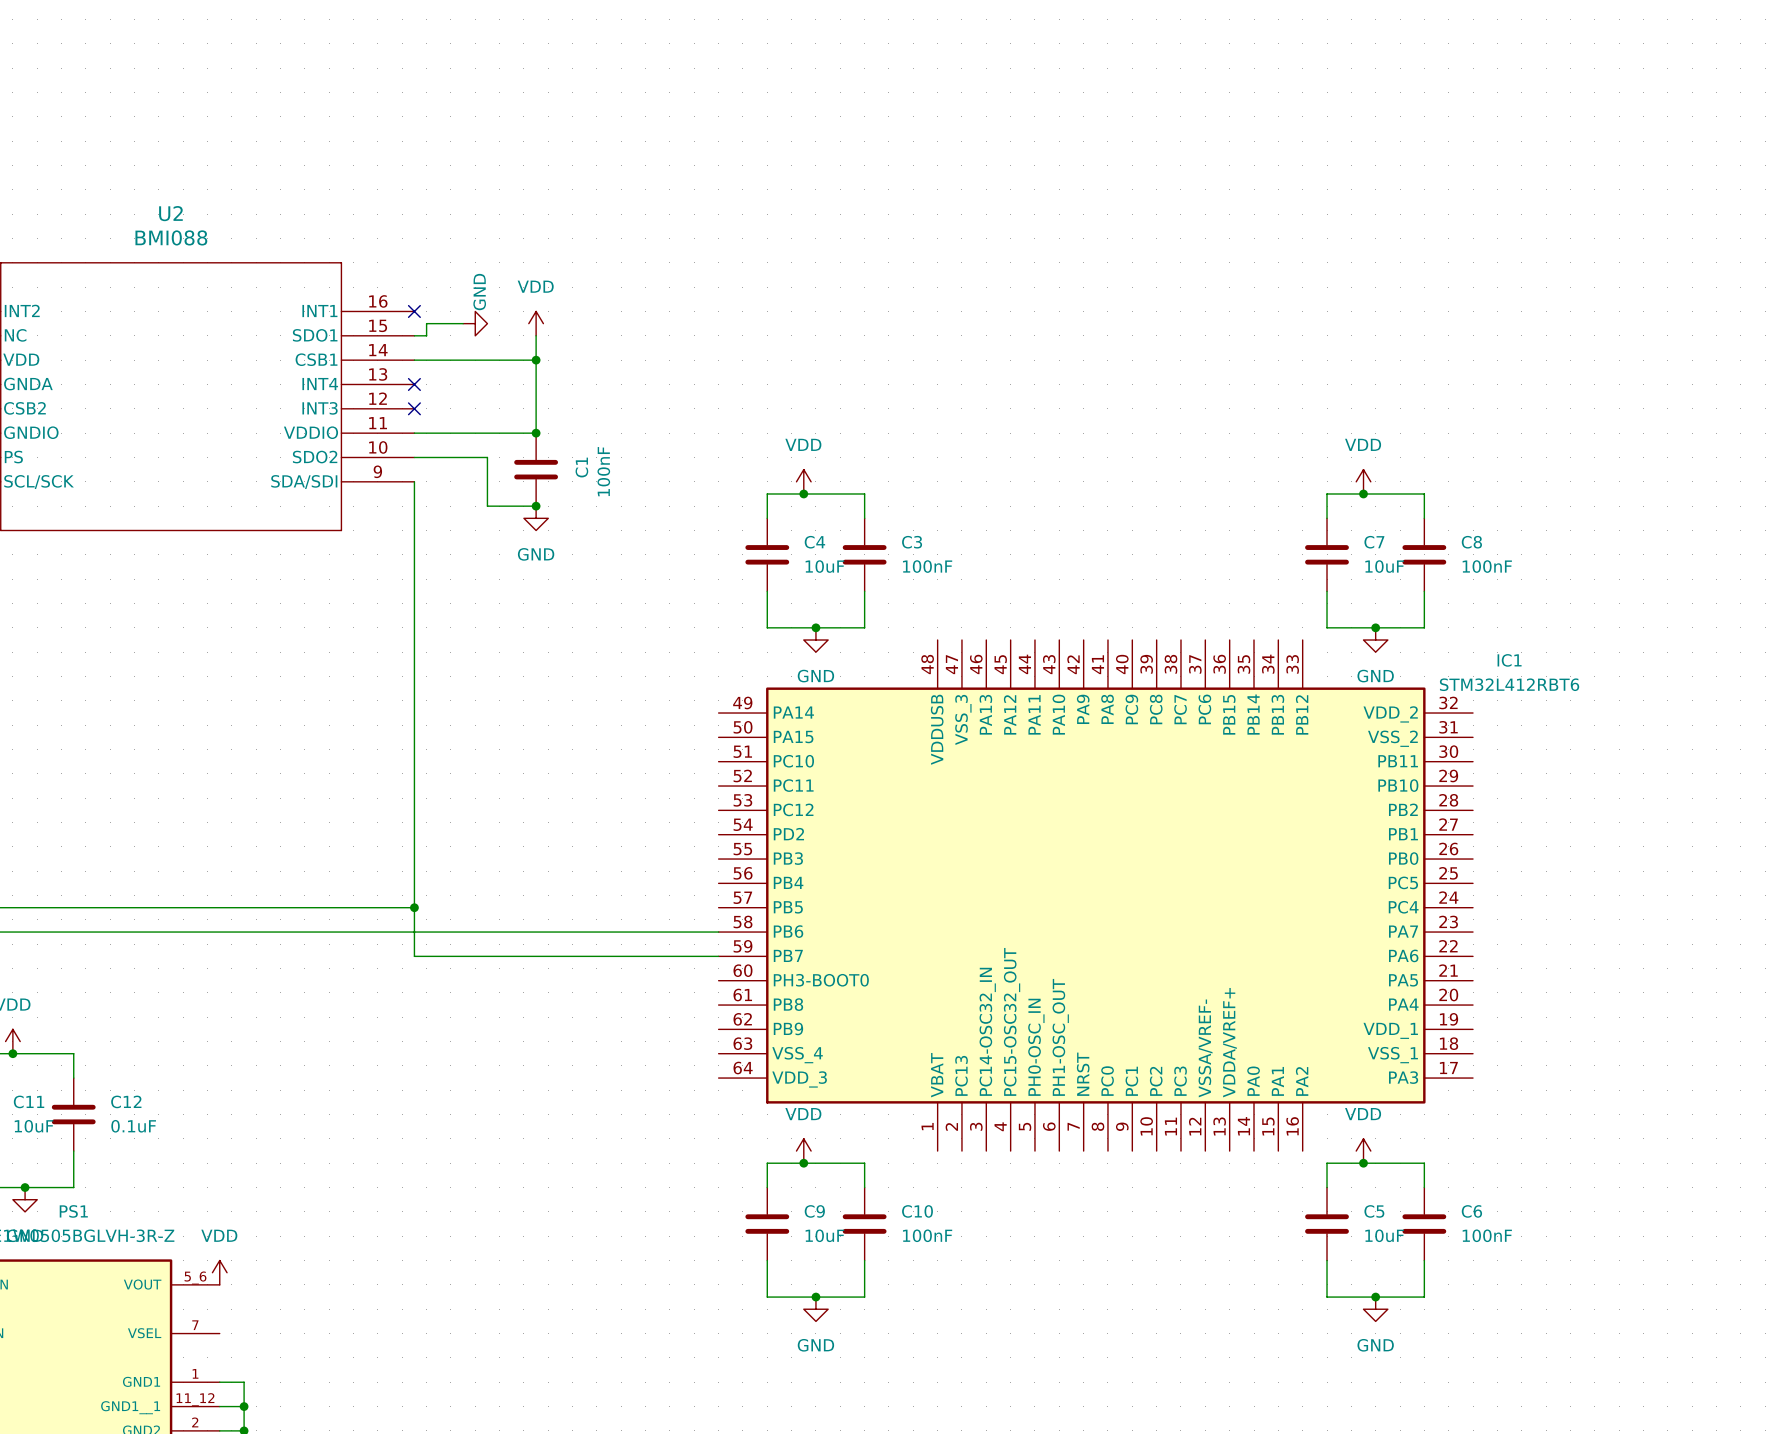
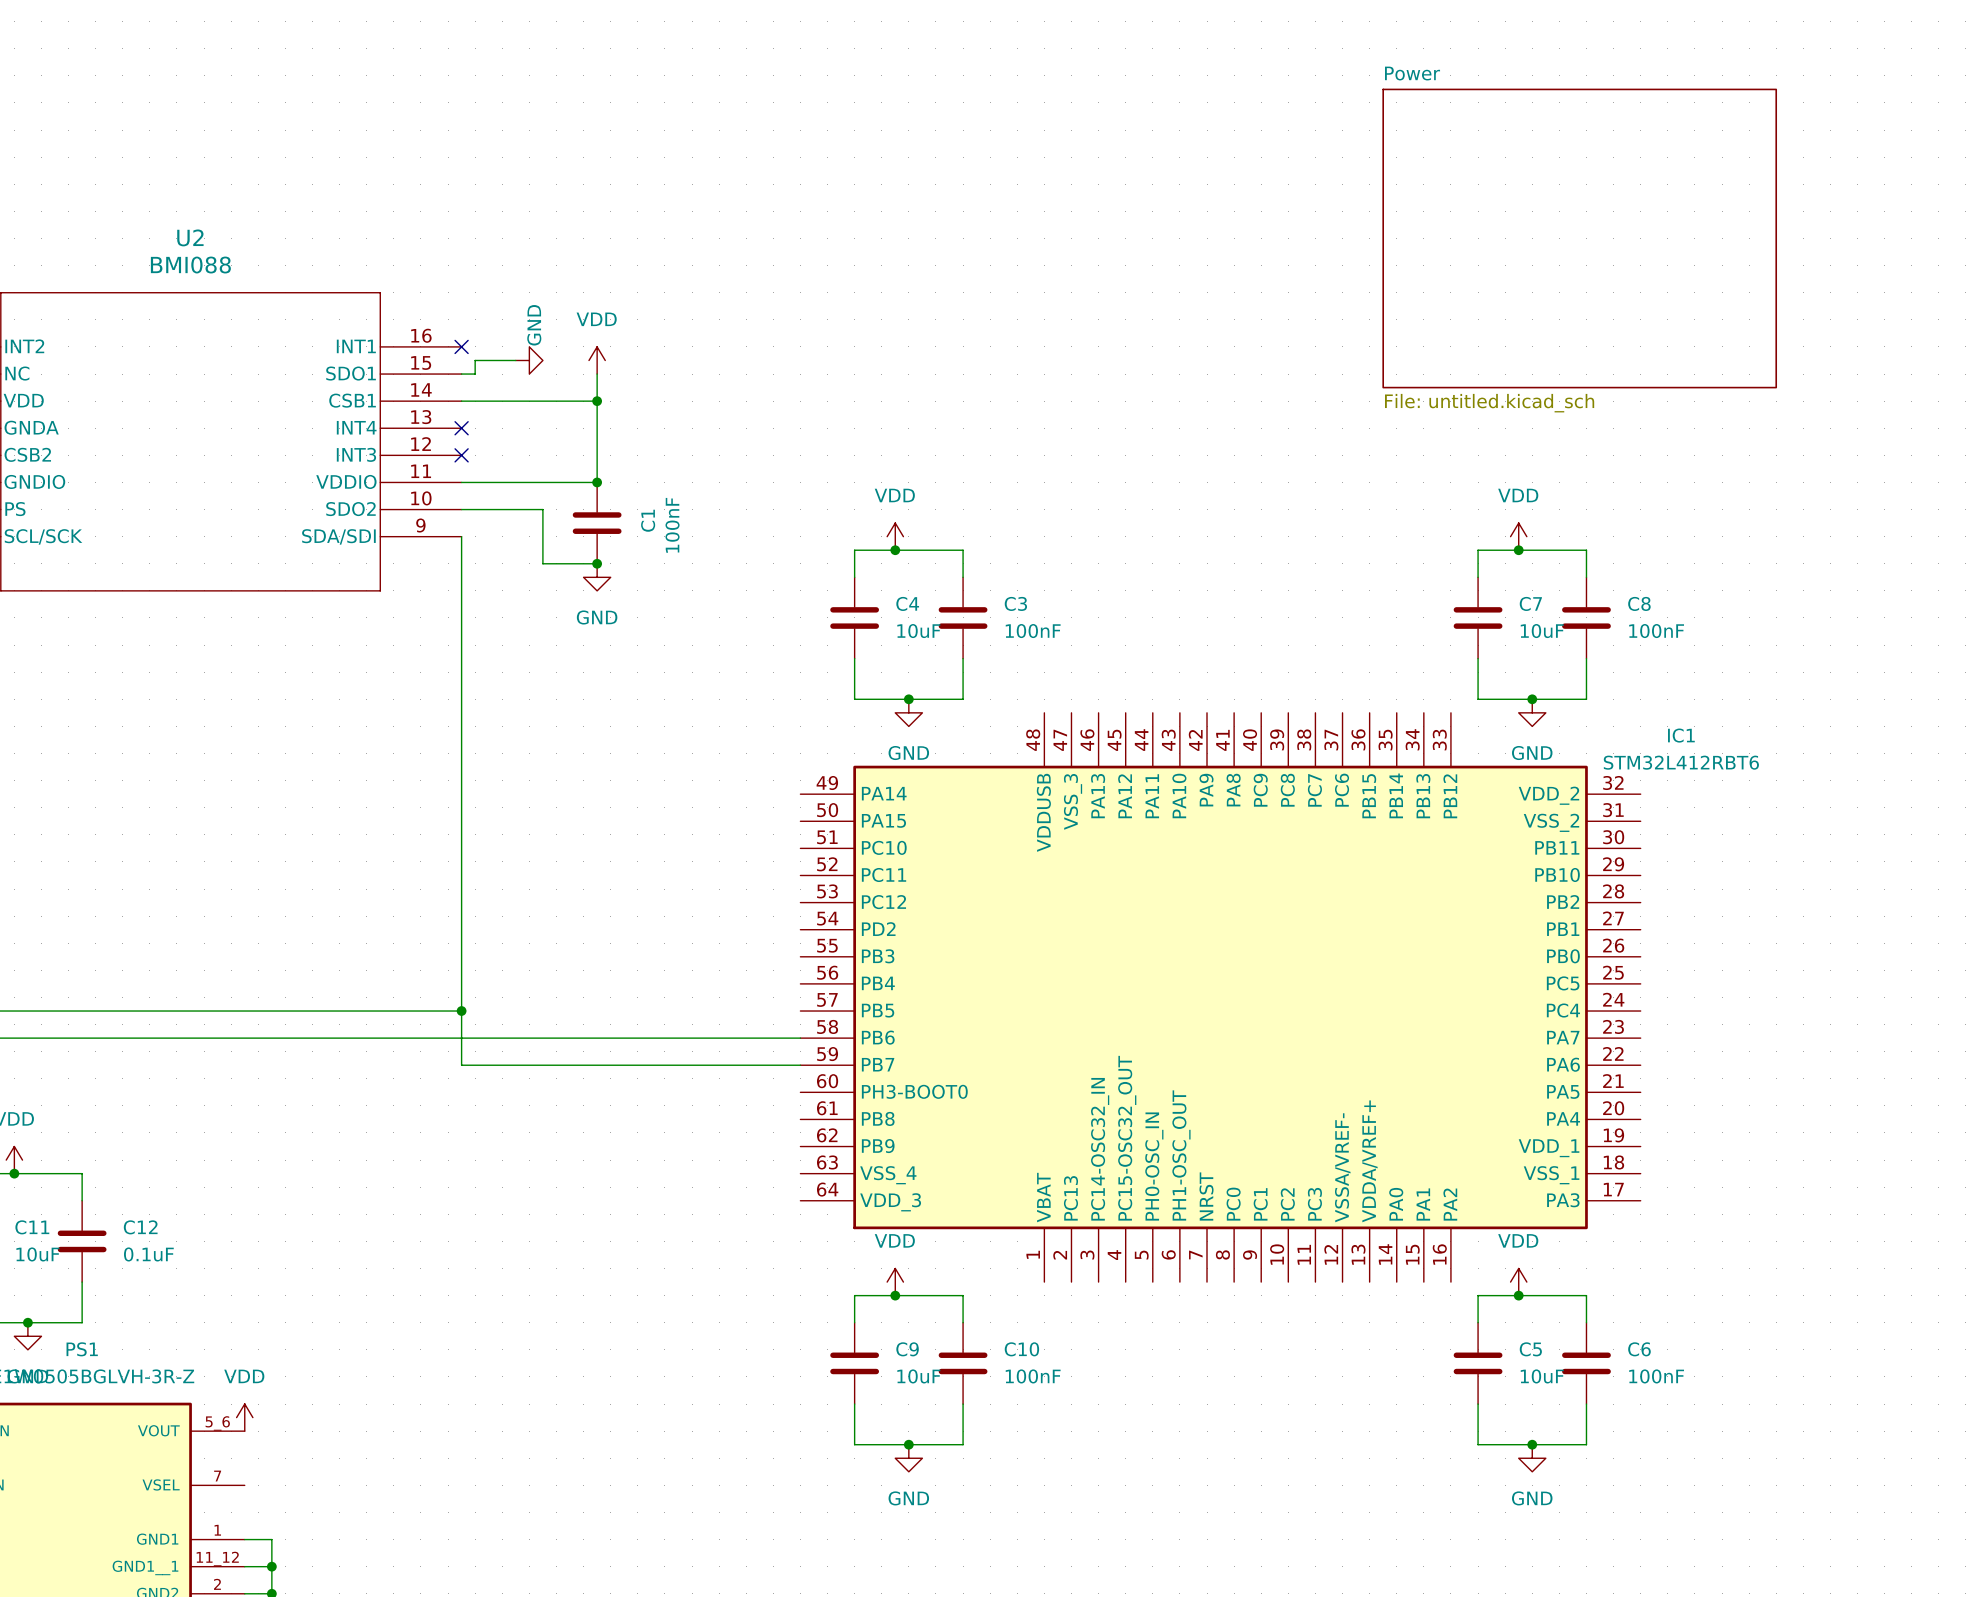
sheet Power: none -> File: untitled.kicad_sch (1579, 238)

